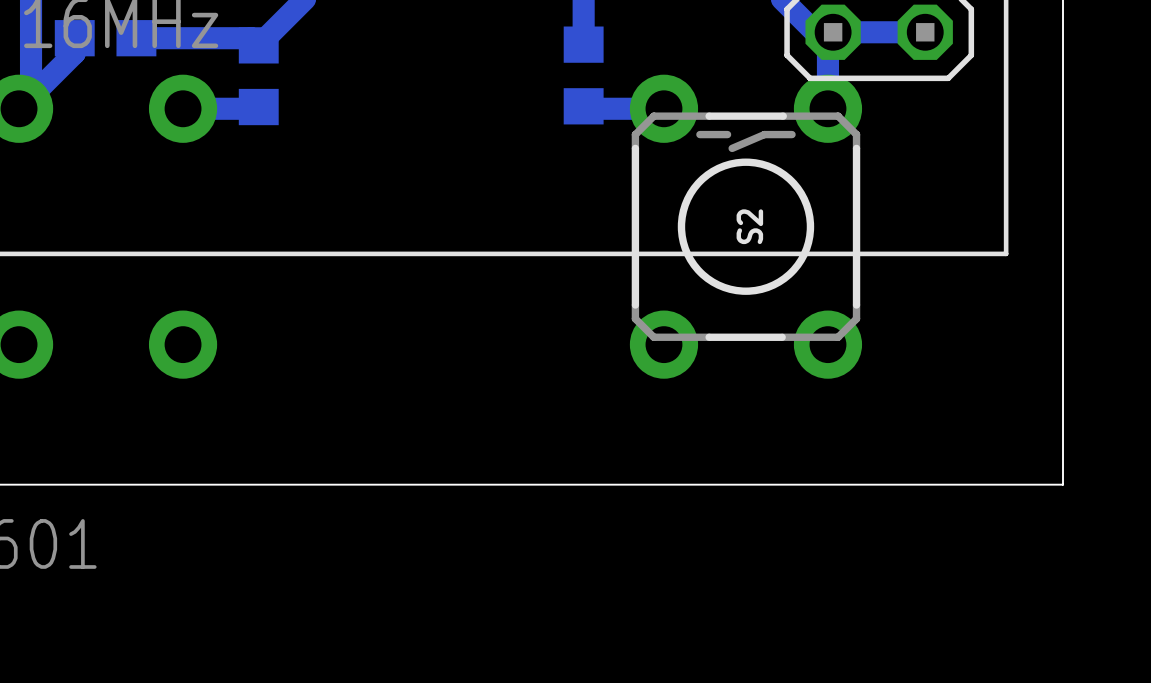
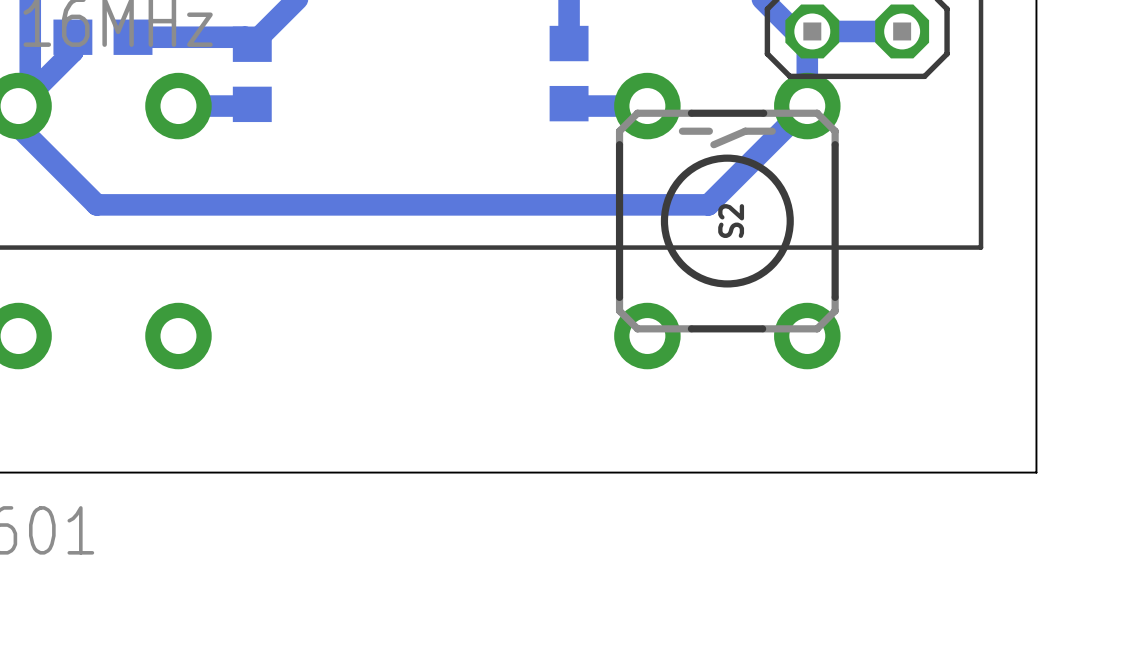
bottom track: none -> (18, 106) (18, 126) (96, 204) (708, 204) (807, 106)

